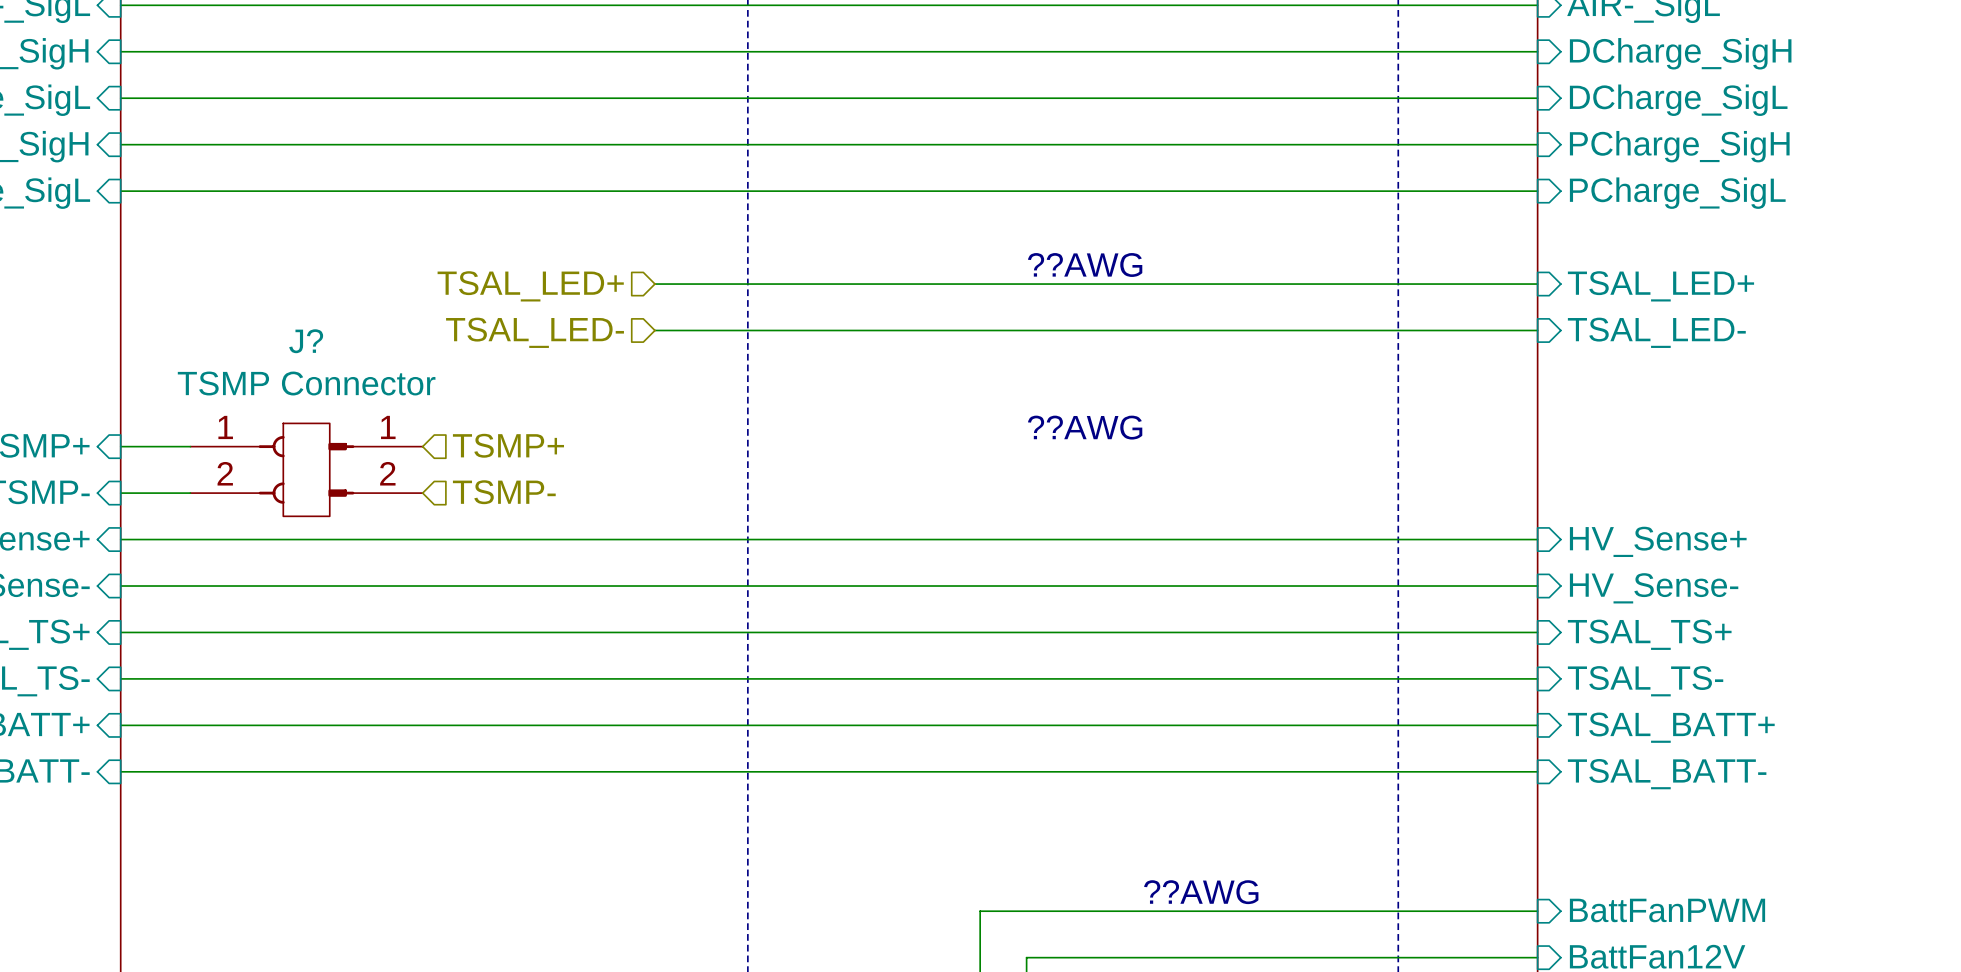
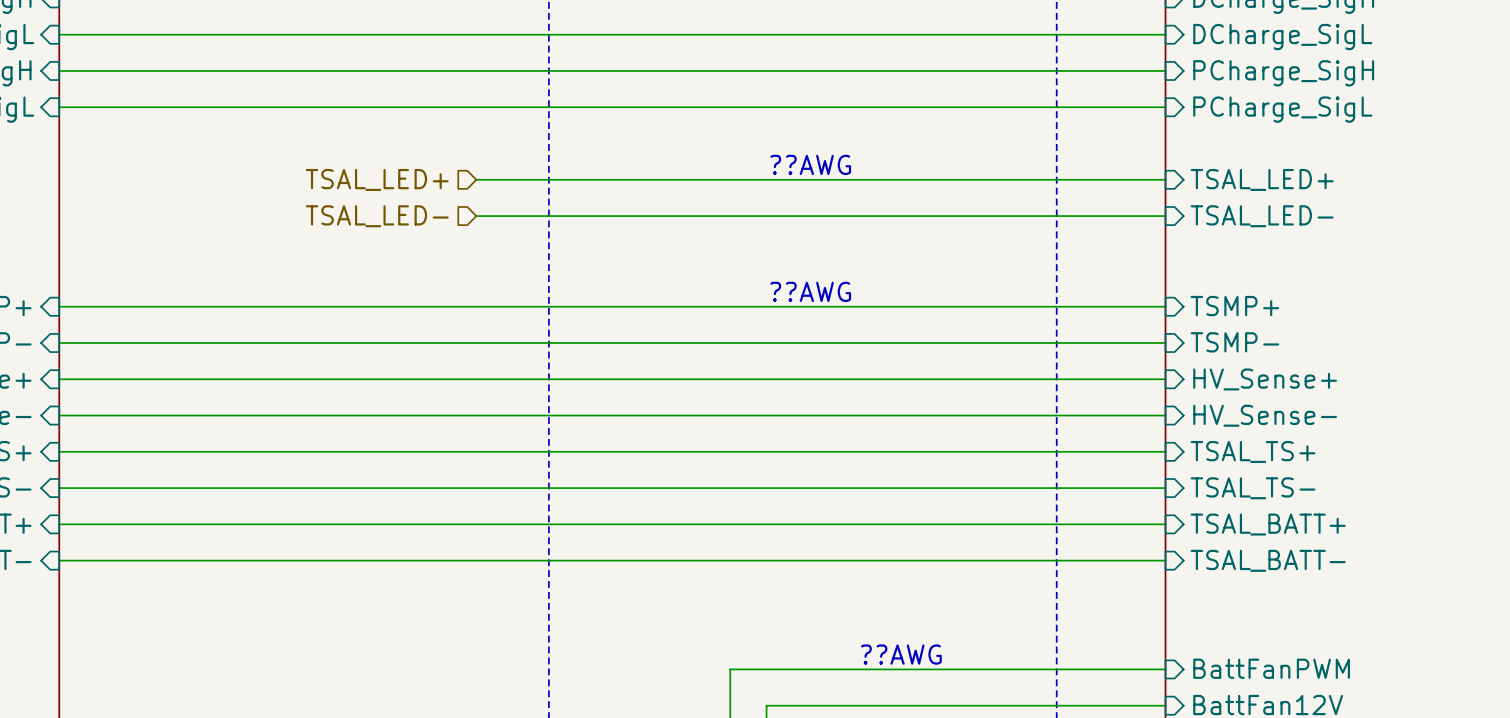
hierarchical label: TSMP+ (508, 445) -> none
sheet pin: none -> TSMP+ (1234, 306)
wire: none -> (113, 306) (1165, 306)
J?: TSMP Connector (306, 469) -> none
hierarchical label: TSMP- (504, 492) -> none
sheet pin: none -> TSMP- (1234, 342)
wire: none -> (113, 343) (1165, 343)

